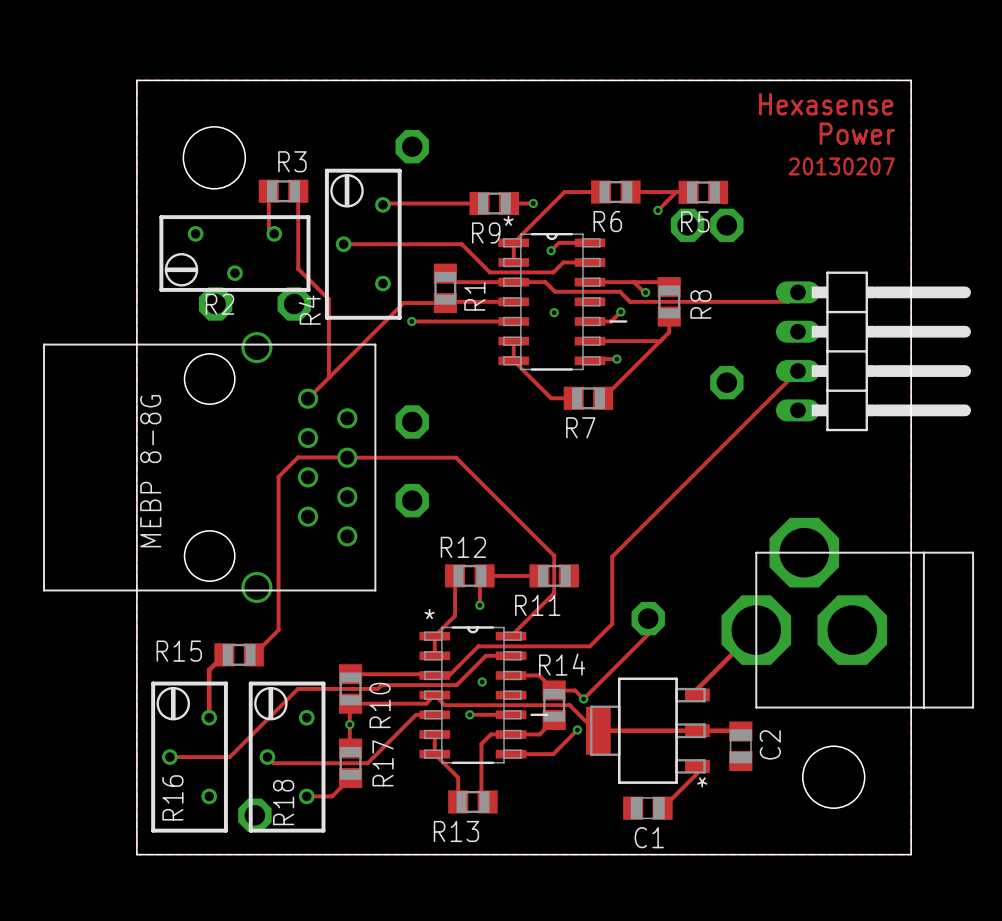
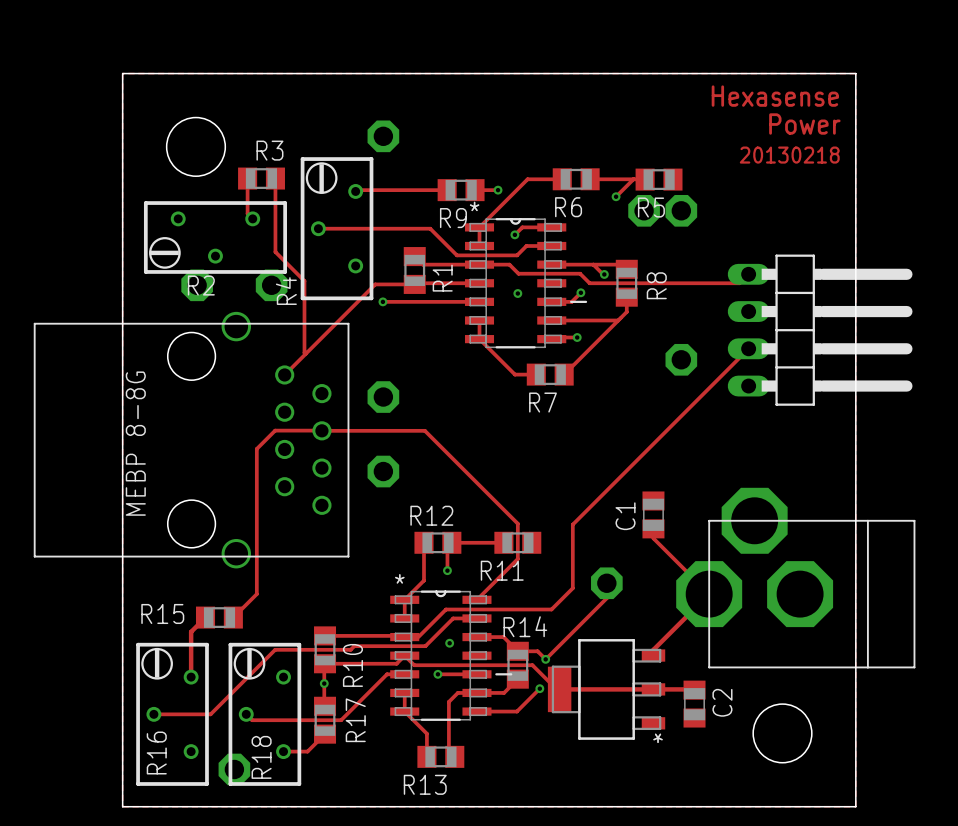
text: 20130207 (841, 166) -> 20130218 (789, 155)
track: none -> (653, 528) (653, 538) (709, 594)
track: (697, 766) (697, 773) (662, 808) -> none
C1 rotation: 0° (647, 808) -> 90° clockwise (653, 514)
C1 position: (647, 808) -> (653, 514)

